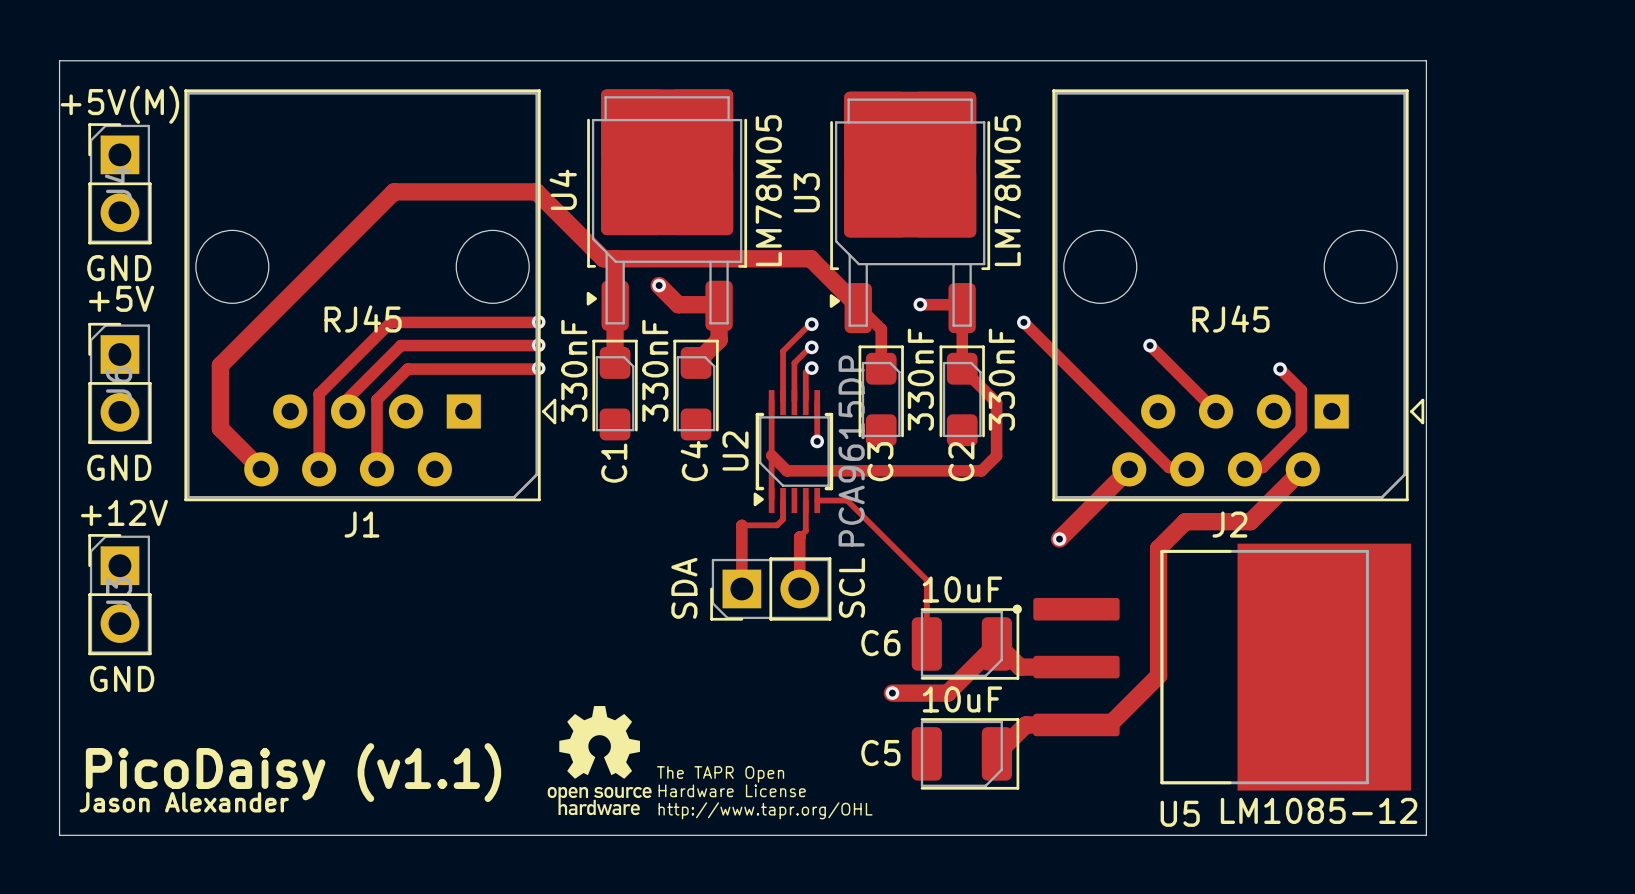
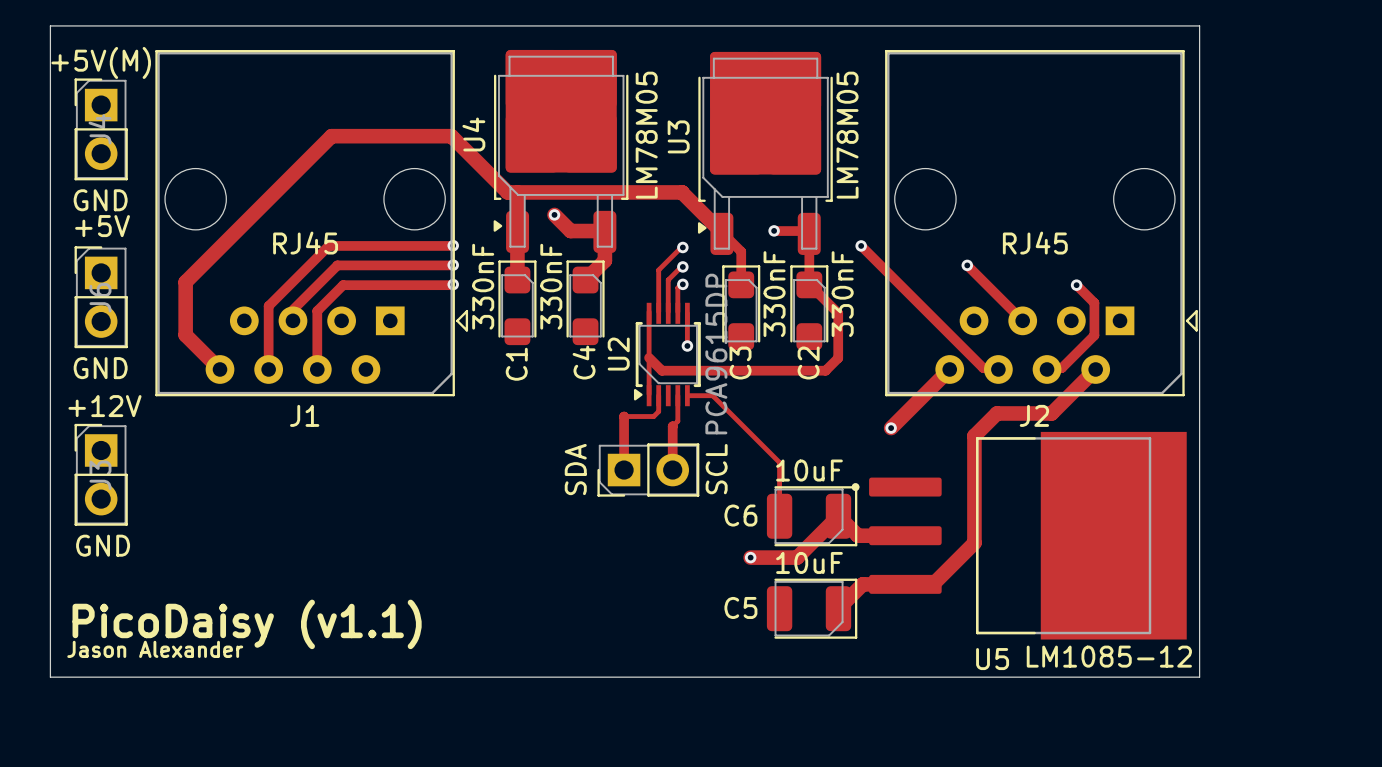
drawing: [547, 706, 652, 816] -> none
text: The TAPR Open (720, 774) -> none
text: Hardware License (732, 790) -> none
text: http://www.tapr.org/OHL (765, 810) -> none

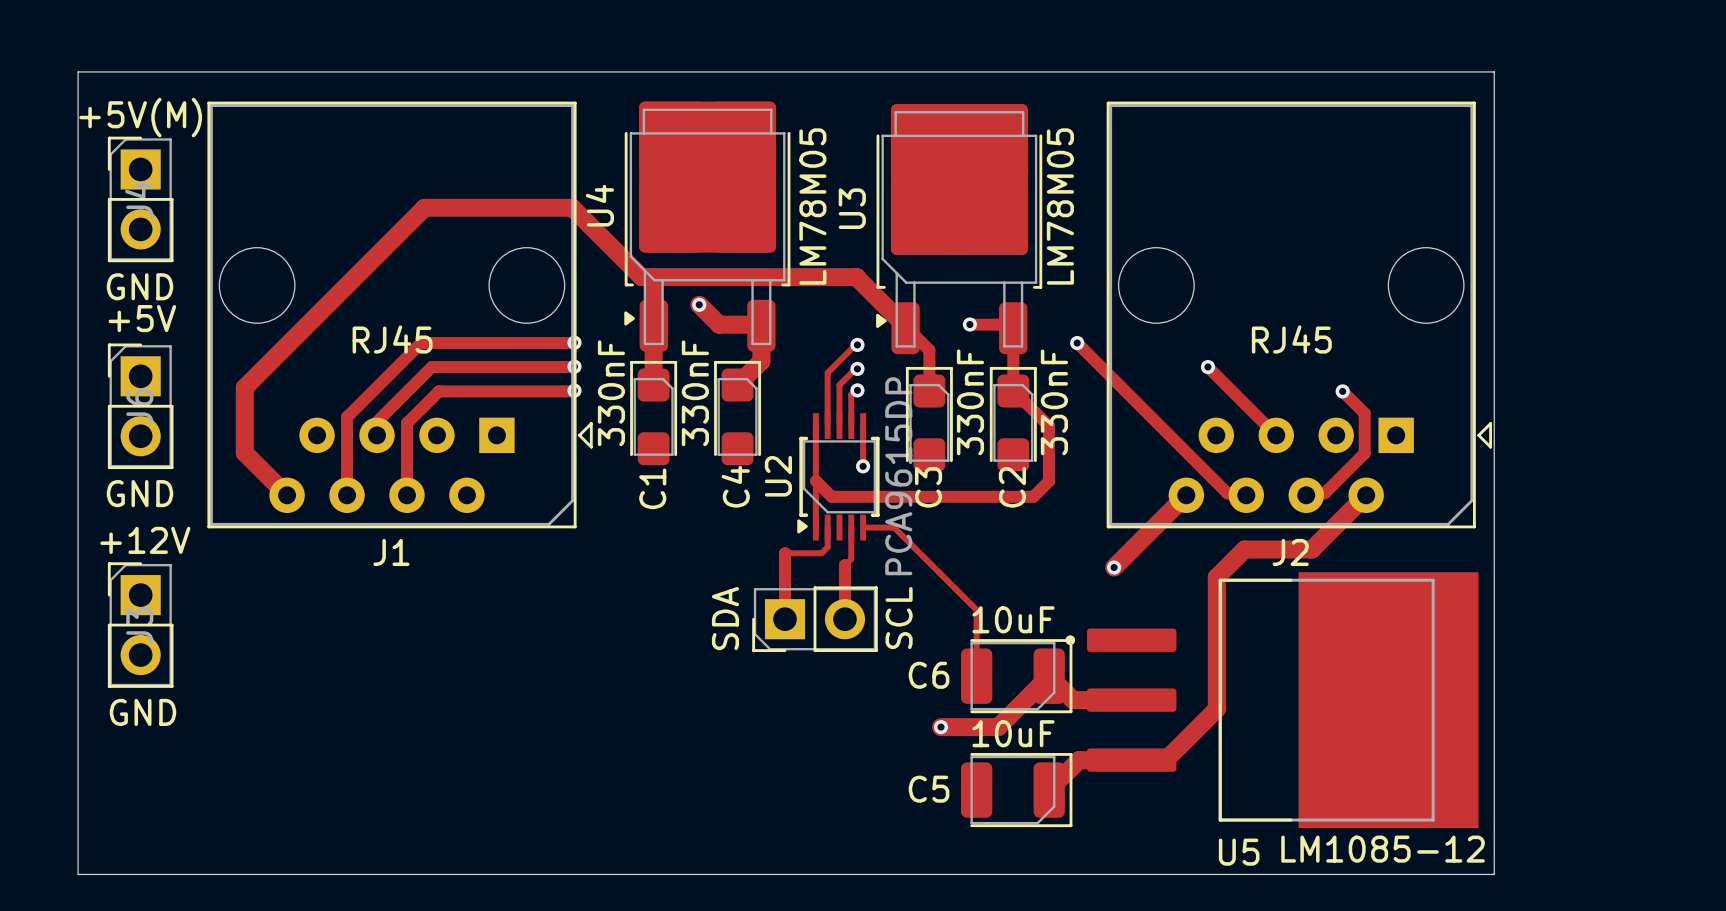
text: PicoDaisy (v1.1) (247, 624) -> none
text: Jason Alexander (155, 649) -> none

